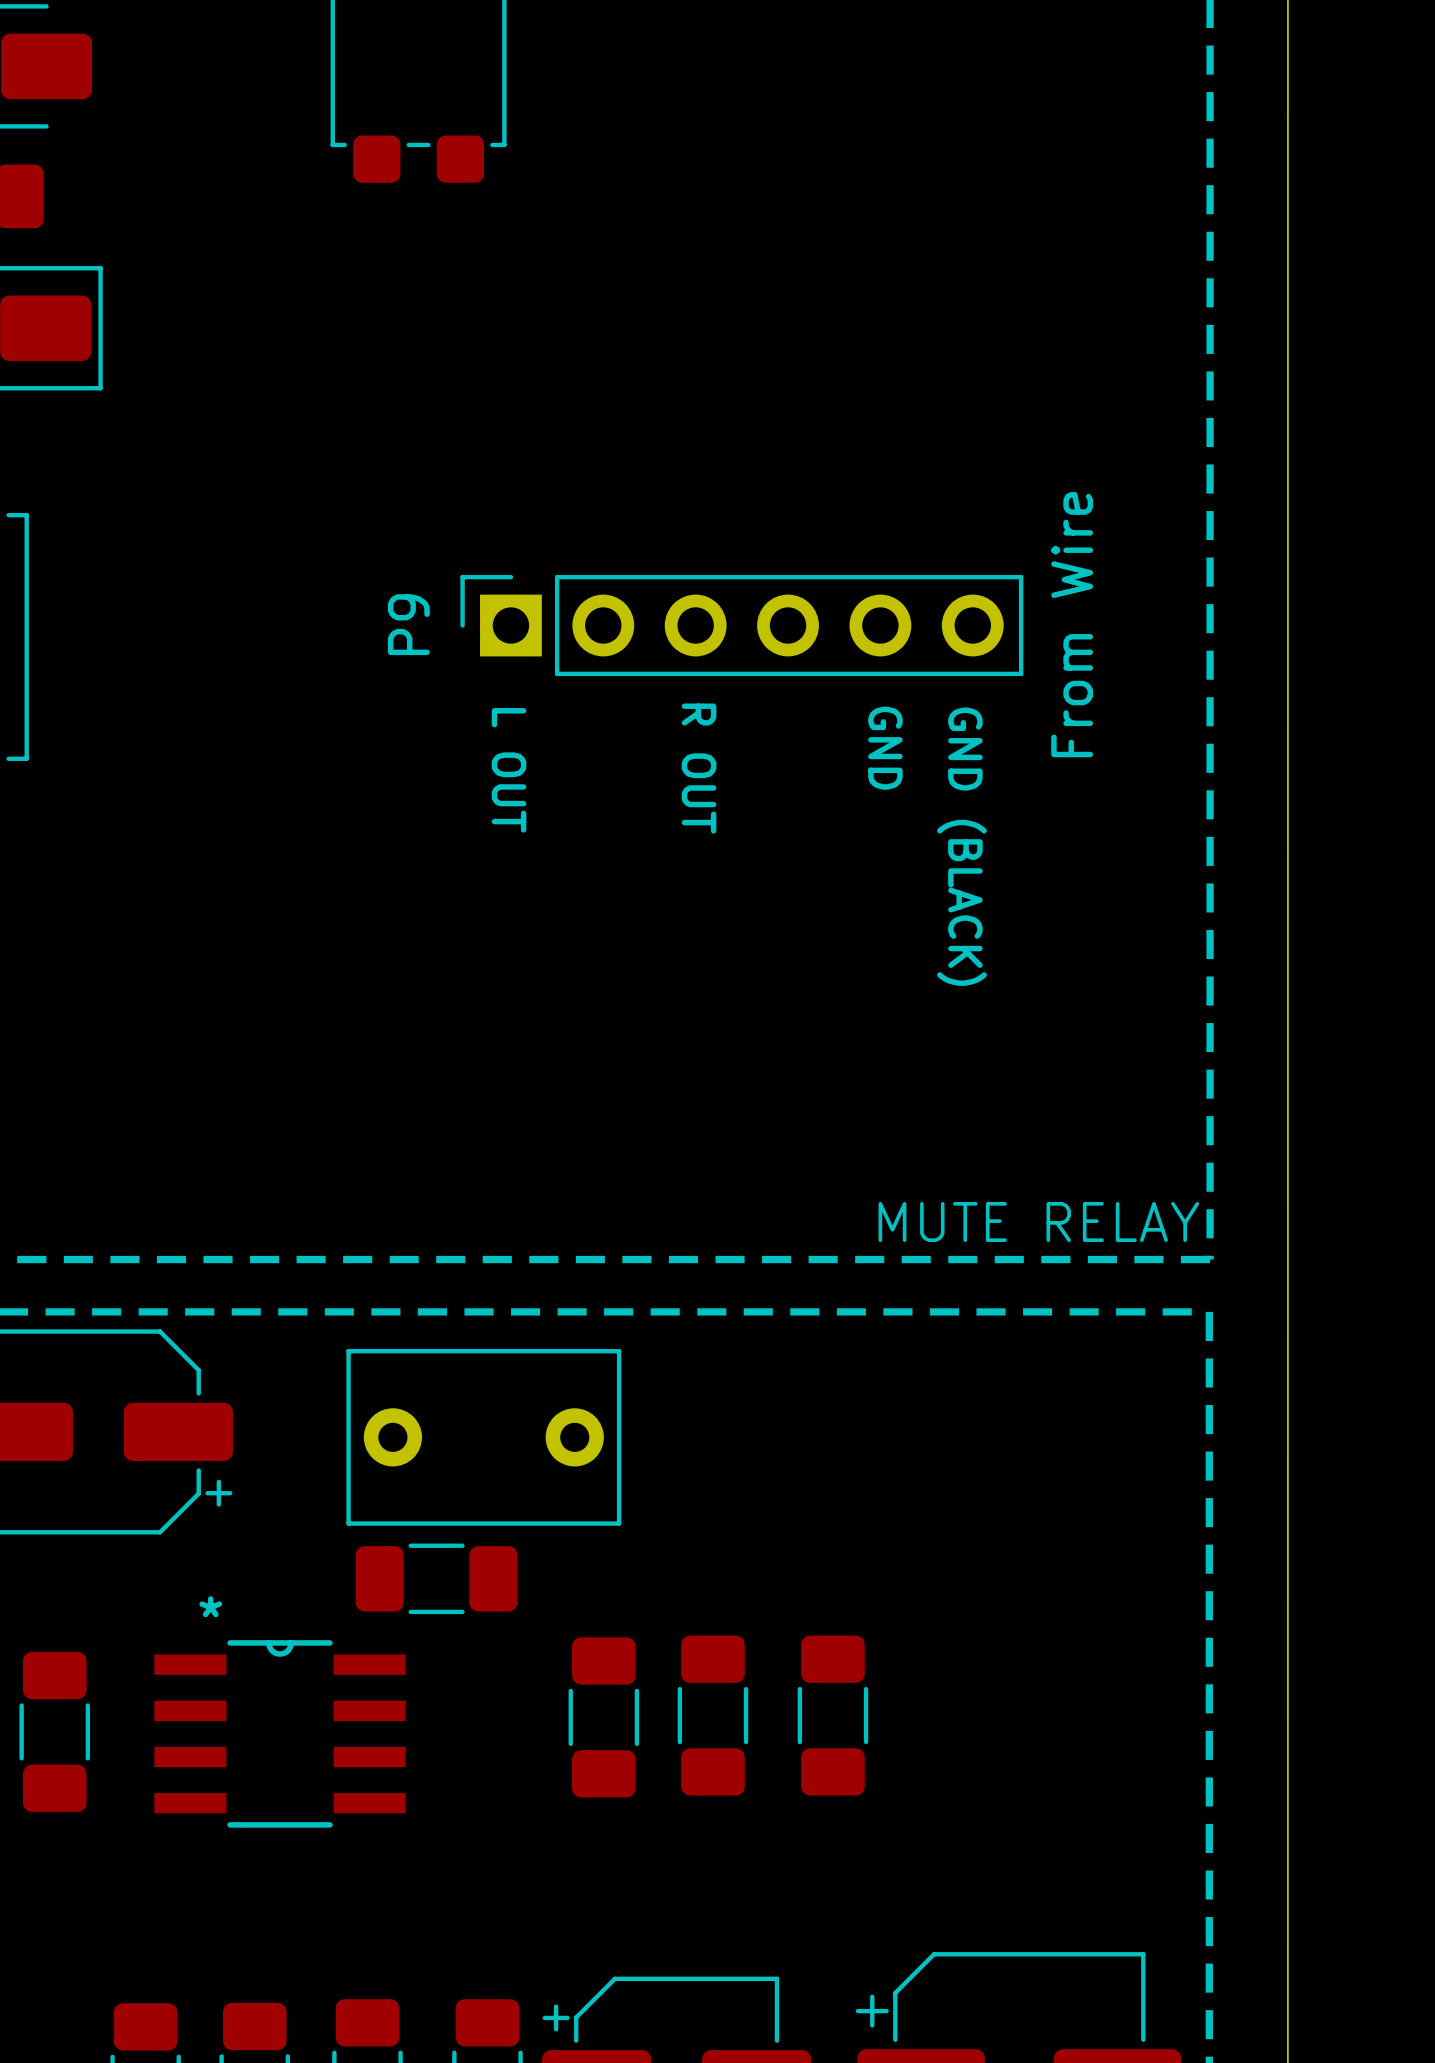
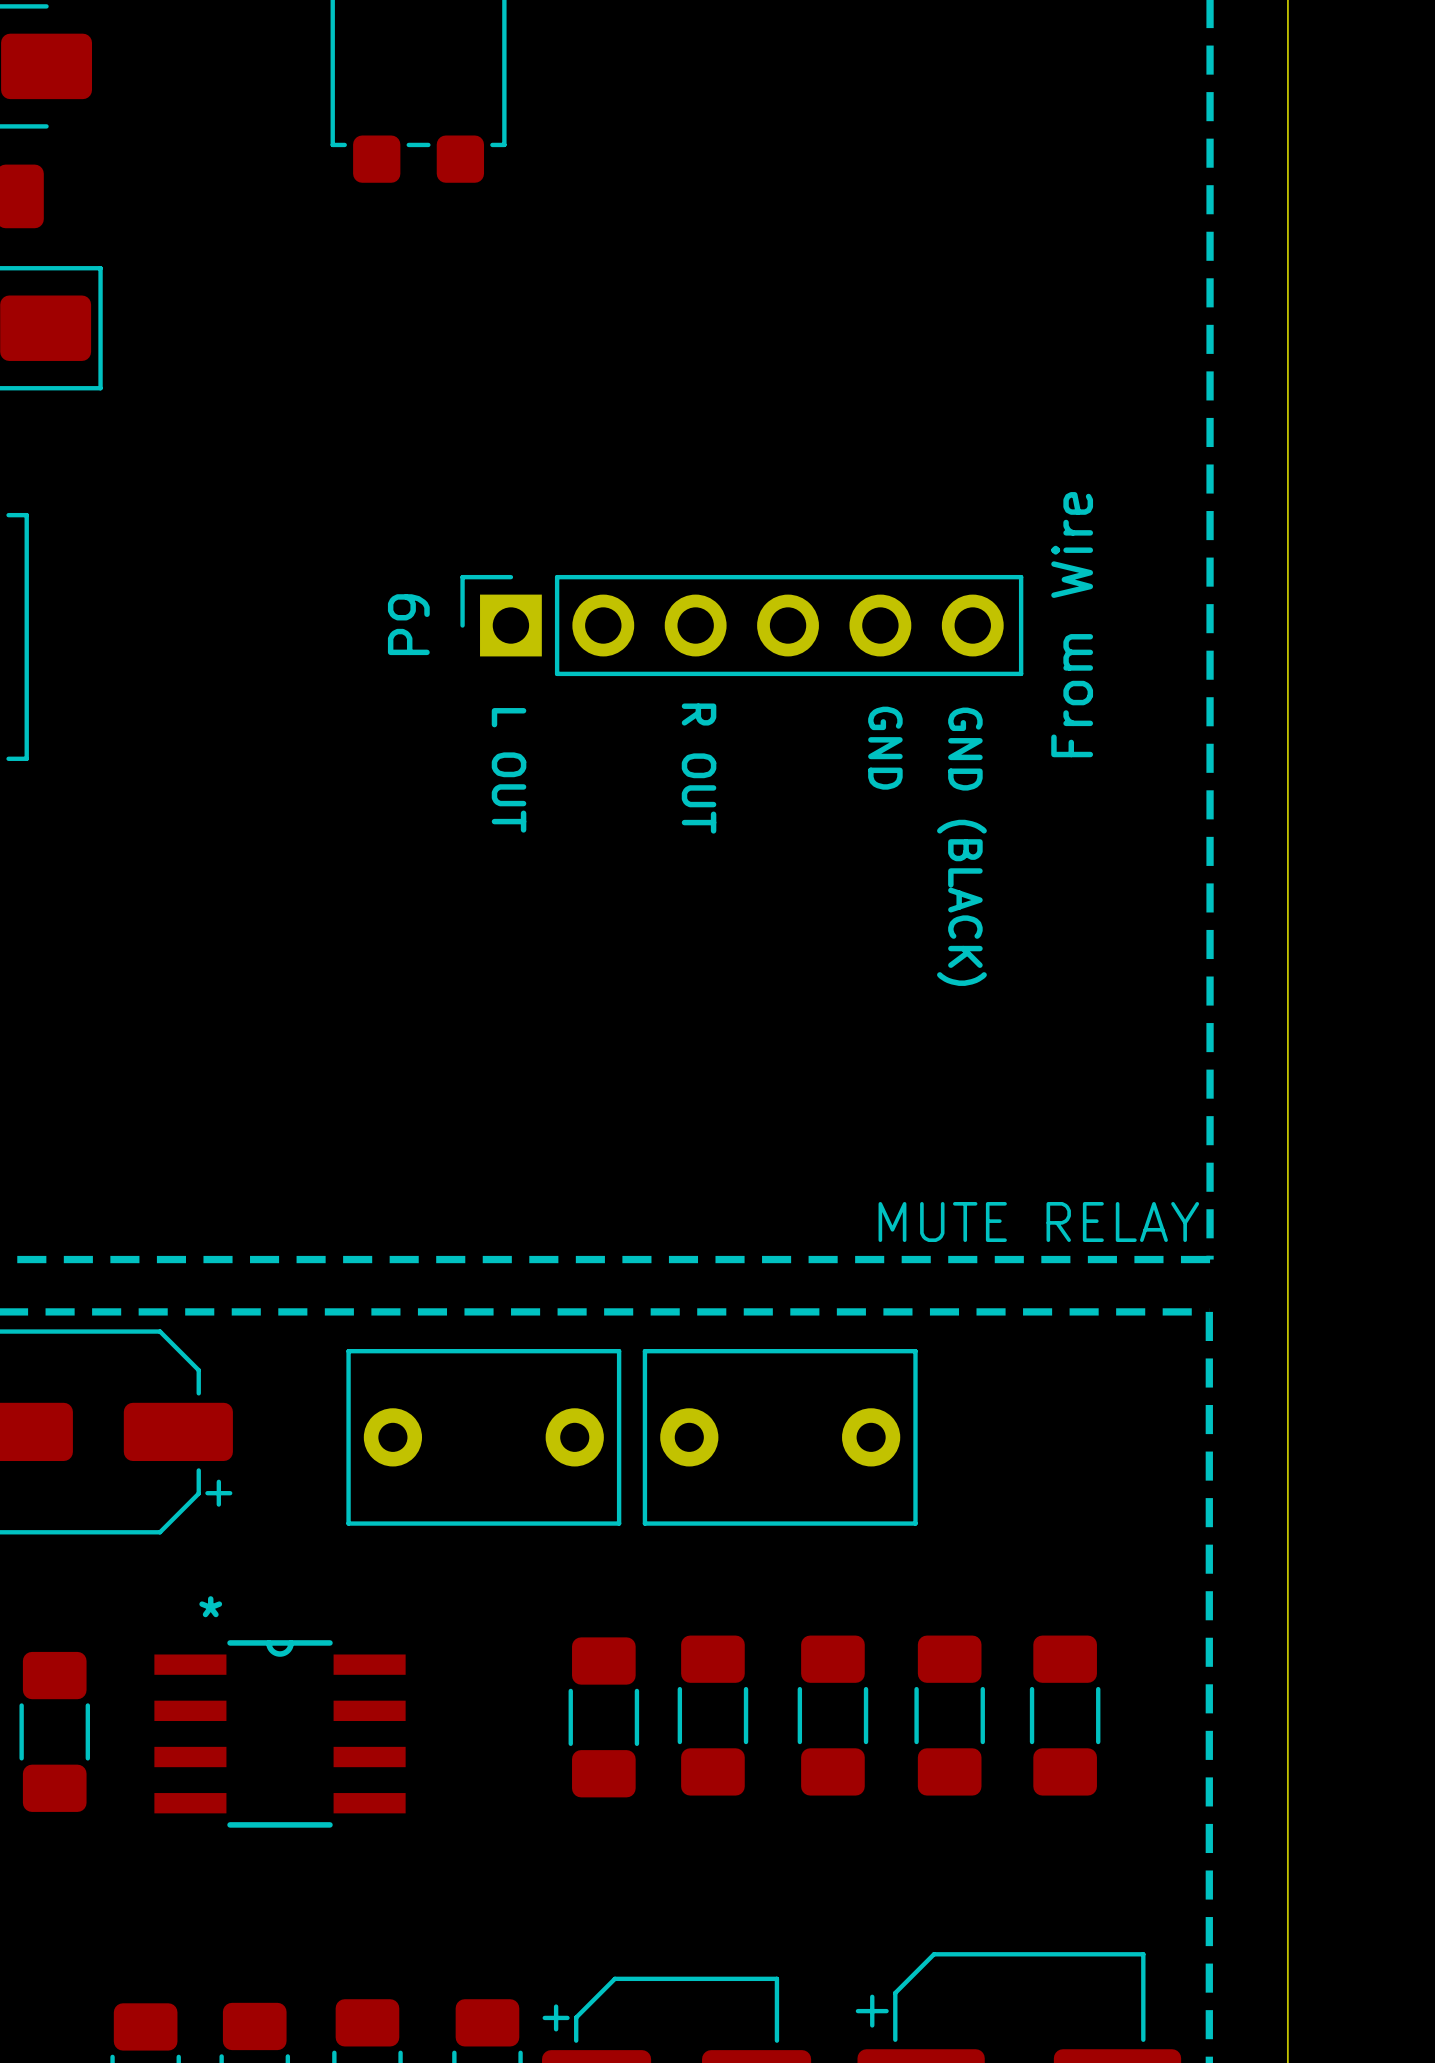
part: none -> (780, 1437)
part: (436, 1578) -> none
part: none -> (949, 1715)
part: none -> (1065, 1715)

